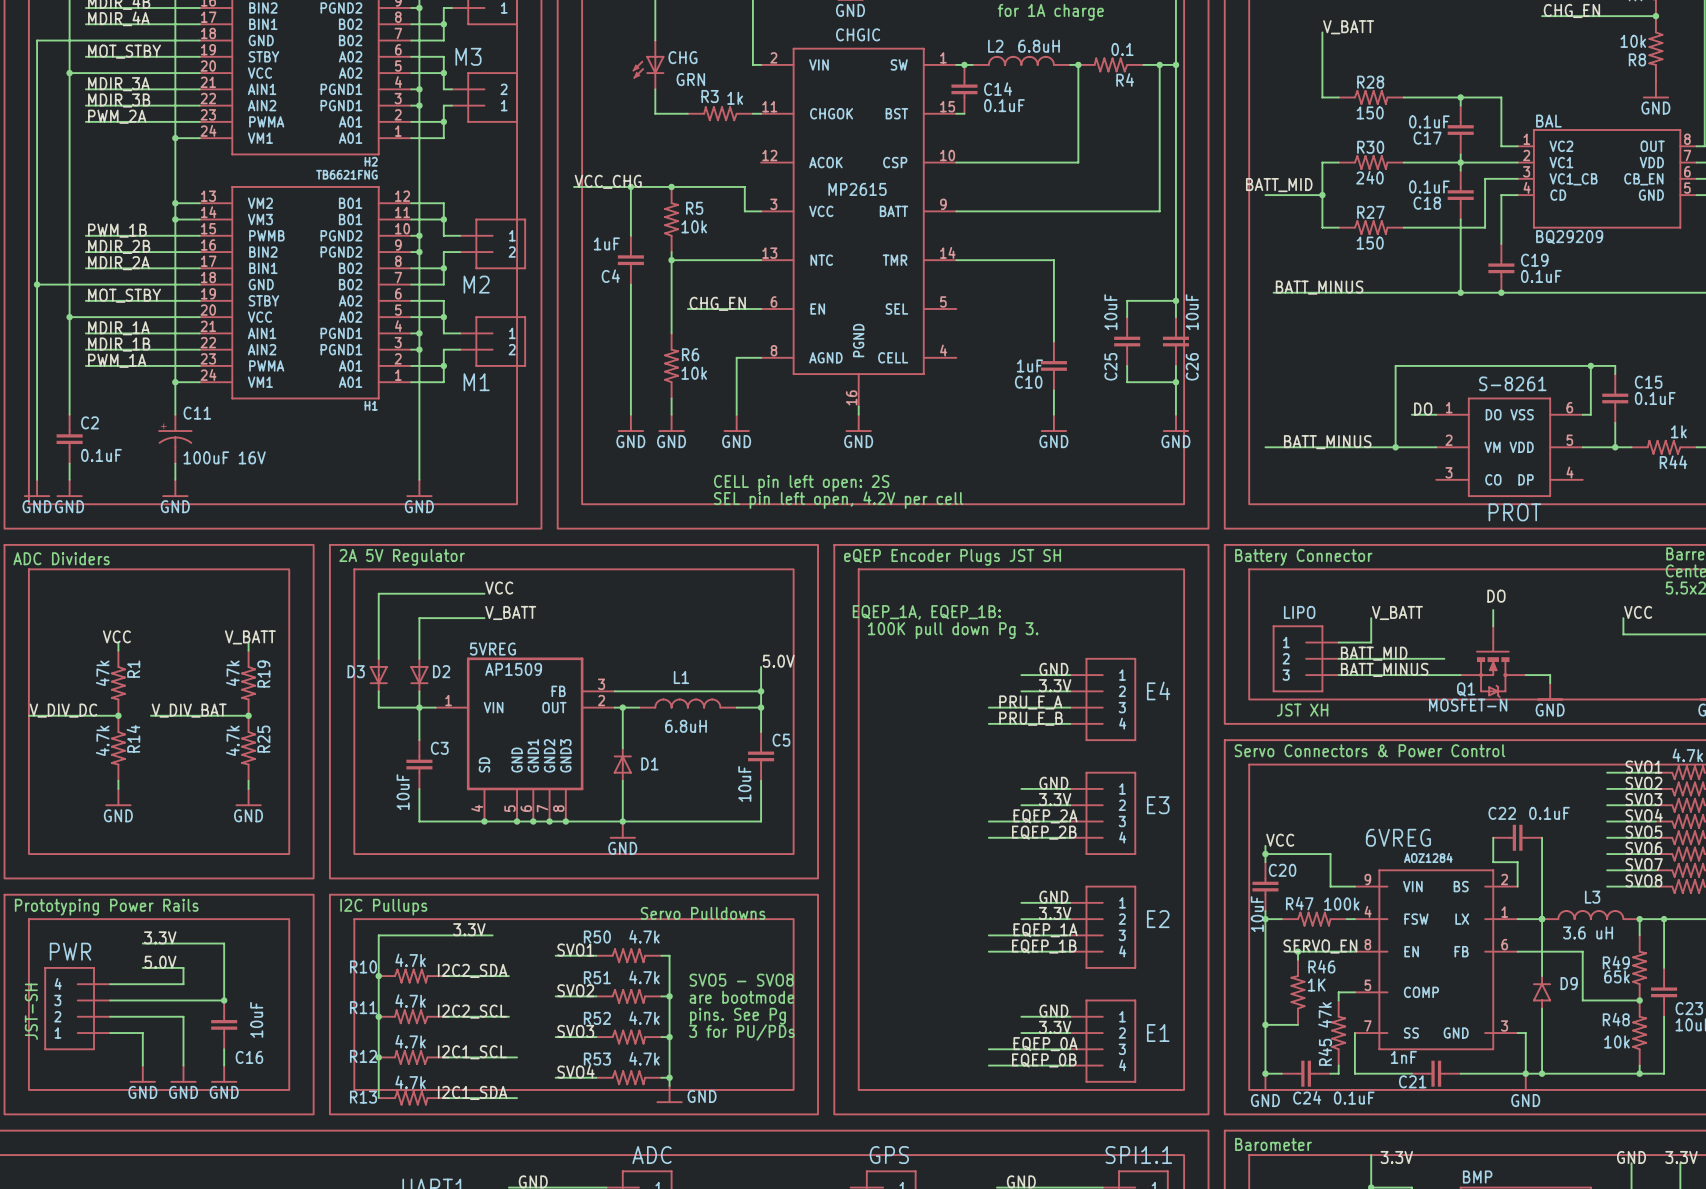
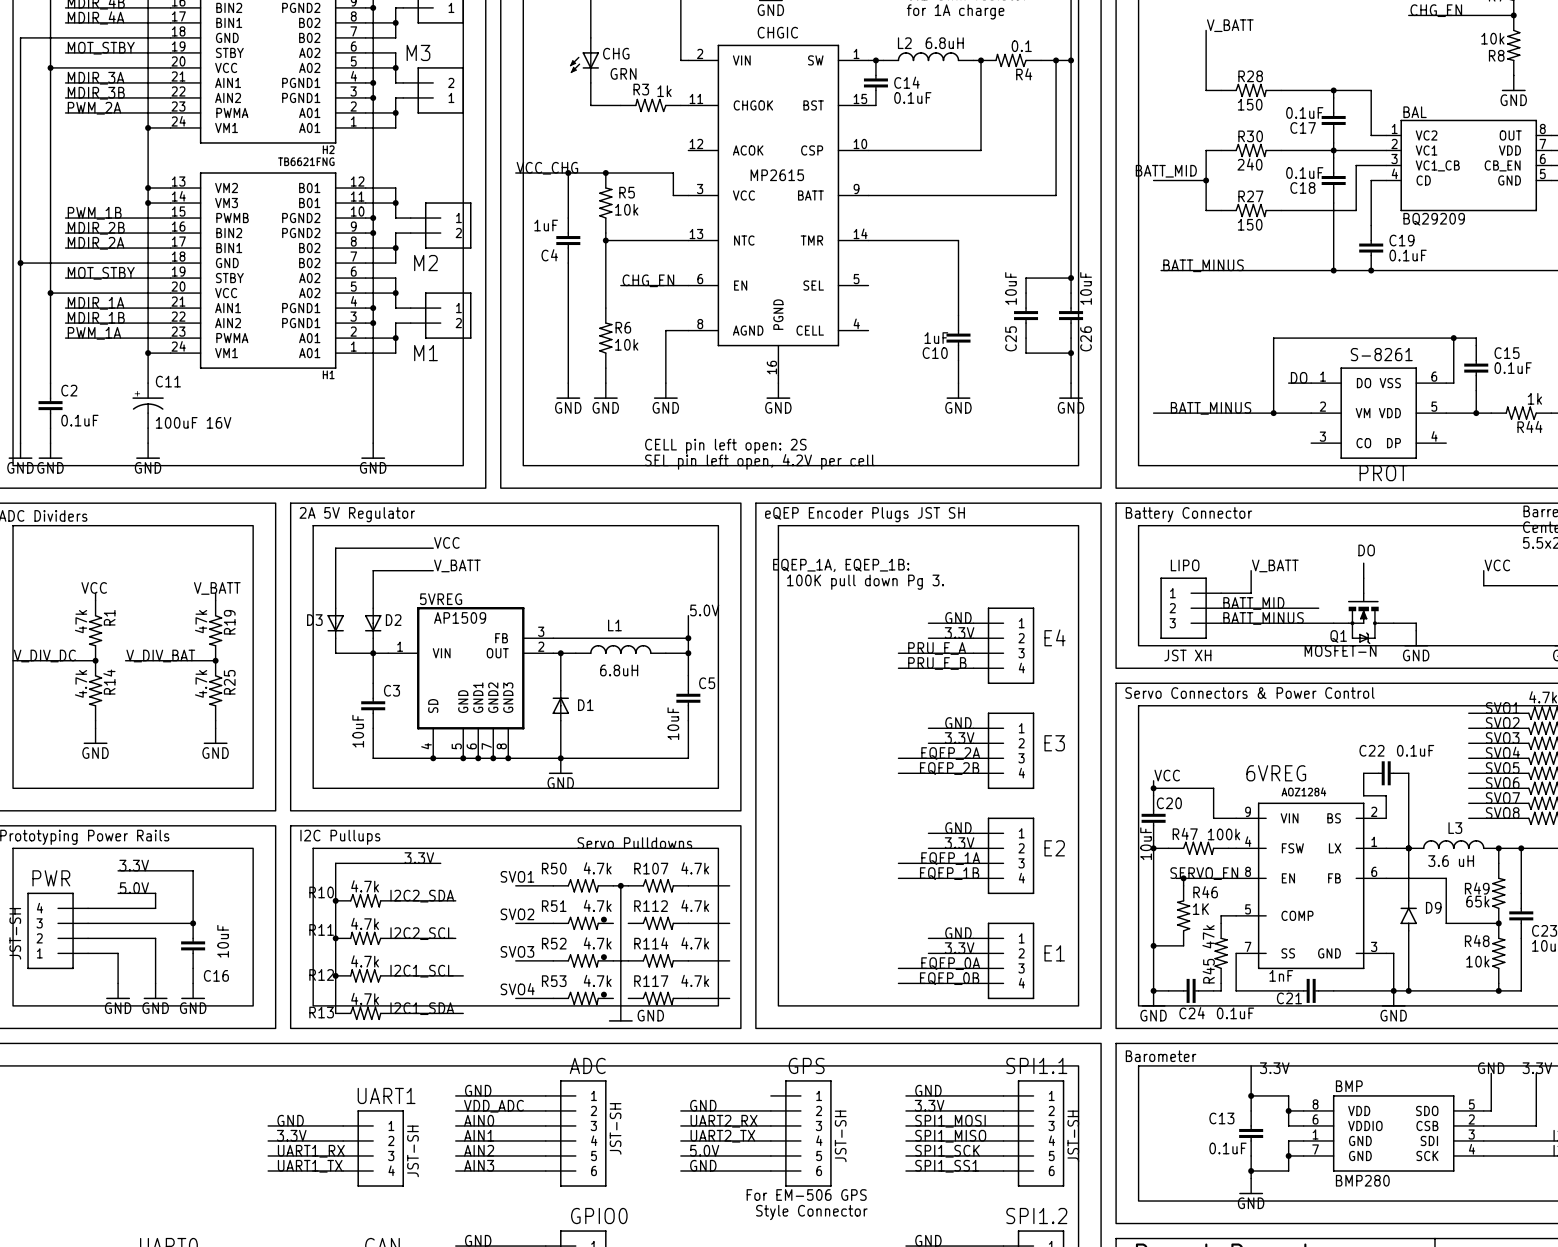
wire: (555, 955) (596, 955) -> (515, 885) (553, 885)
R50 position: (628, 955) -> (583, 885)
wire: (661, 955) (669, 955) (669, 1085) -> none
wire: none -> (613, 885) (628, 885)
wire: none -> (620, 885) (620, 1005)
junction: none -> (620, 885)
R107: none -> 4.7k (658, 885)
wire: none -> (688, 885) (729, 885)
text: SVO5 - SVO8 (741, 980) -> none
wire: (555, 996) (596, 996) -> (515, 923) (553, 923)
R51 position: (628, 996) -> (583, 923)
wire: (661, 996) (669, 996) -> none
text: are bootmode (741, 997) -> none
R112: none -> 4.7k (658, 923)
wire: none -> (688, 923) (729, 923)
text: pins. See Pg (738, 1016) -> none
text: 3 for PU/PDs (741, 1032) -> none
wire: (555, 1037) (596, 1037) -> (515, 960) (553, 960)
R52 position: (628, 1037) -> (583, 960)
wire: (661, 1037) (669, 1037) -> none
wire: none -> (613, 960) (628, 960)
R114: none -> 4.7k (658, 960)
wire: none -> (688, 960) (729, 960)
wire: (555, 1077) (596, 1077) -> (515, 998) (553, 998)
R53 position: (628, 1077) -> (583, 998)
wire: (661, 1077) (669, 1077) -> none
R117: none -> 4.7k (658, 998)
wire: none -> (688, 998) (729, 998)
power symbol position: GND (669, 1094) -> GND (620, 1013)

